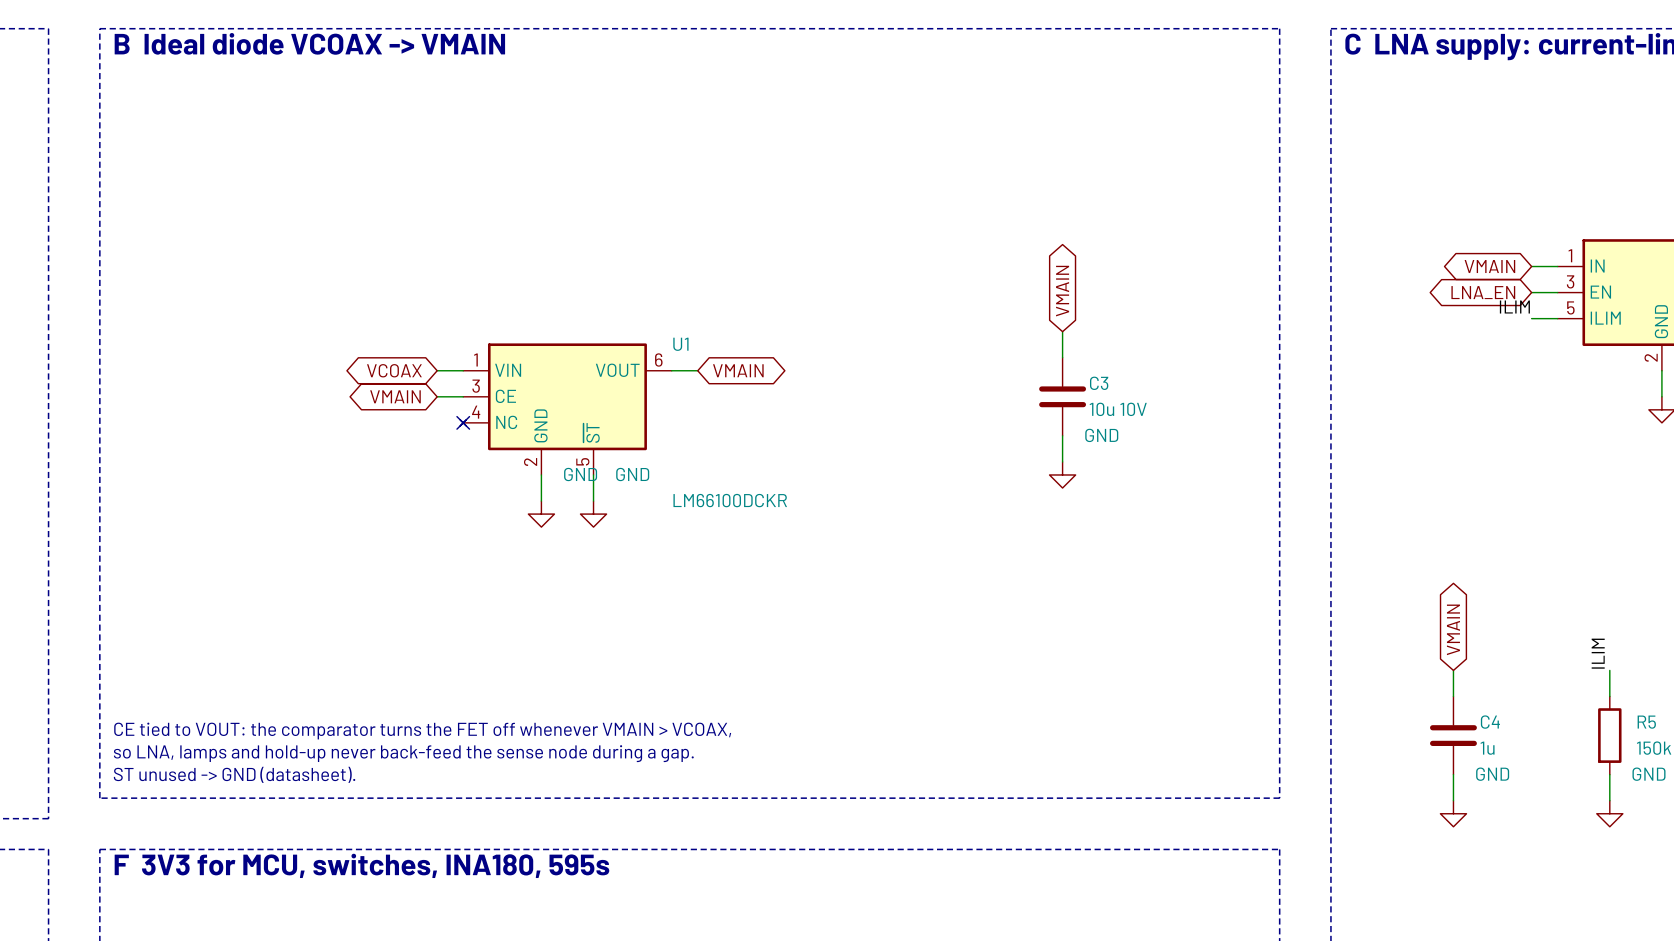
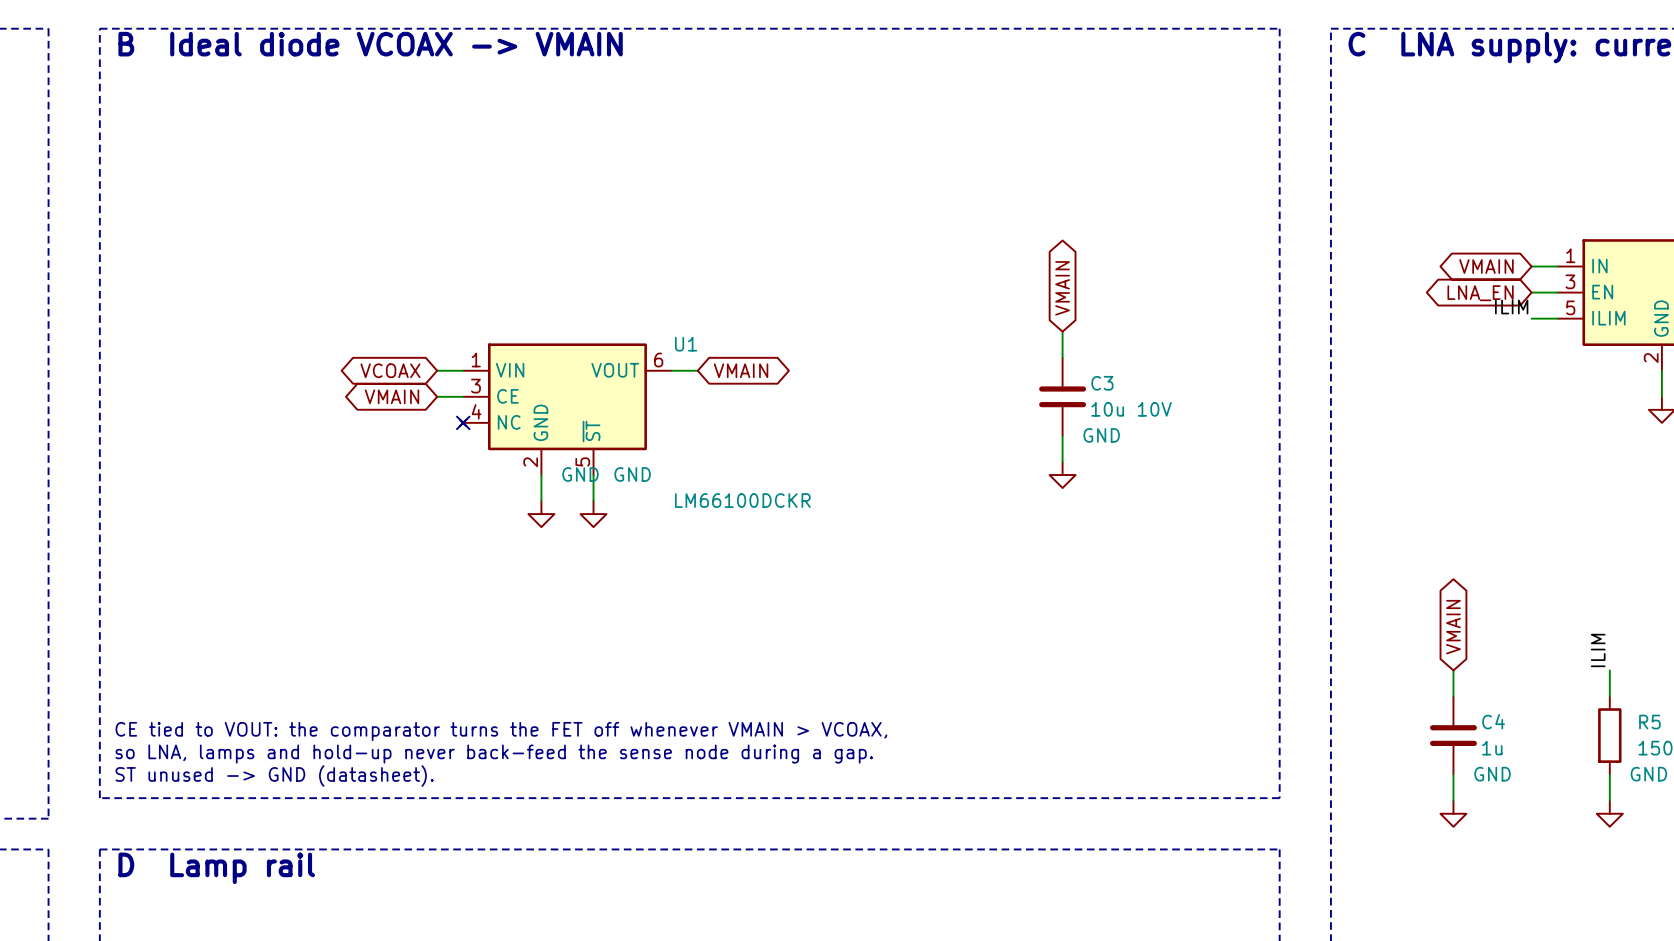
text: F 3V3 for MCU, switches, INA180, 595s (361, 865) -> D Lamp rail (216, 868)

